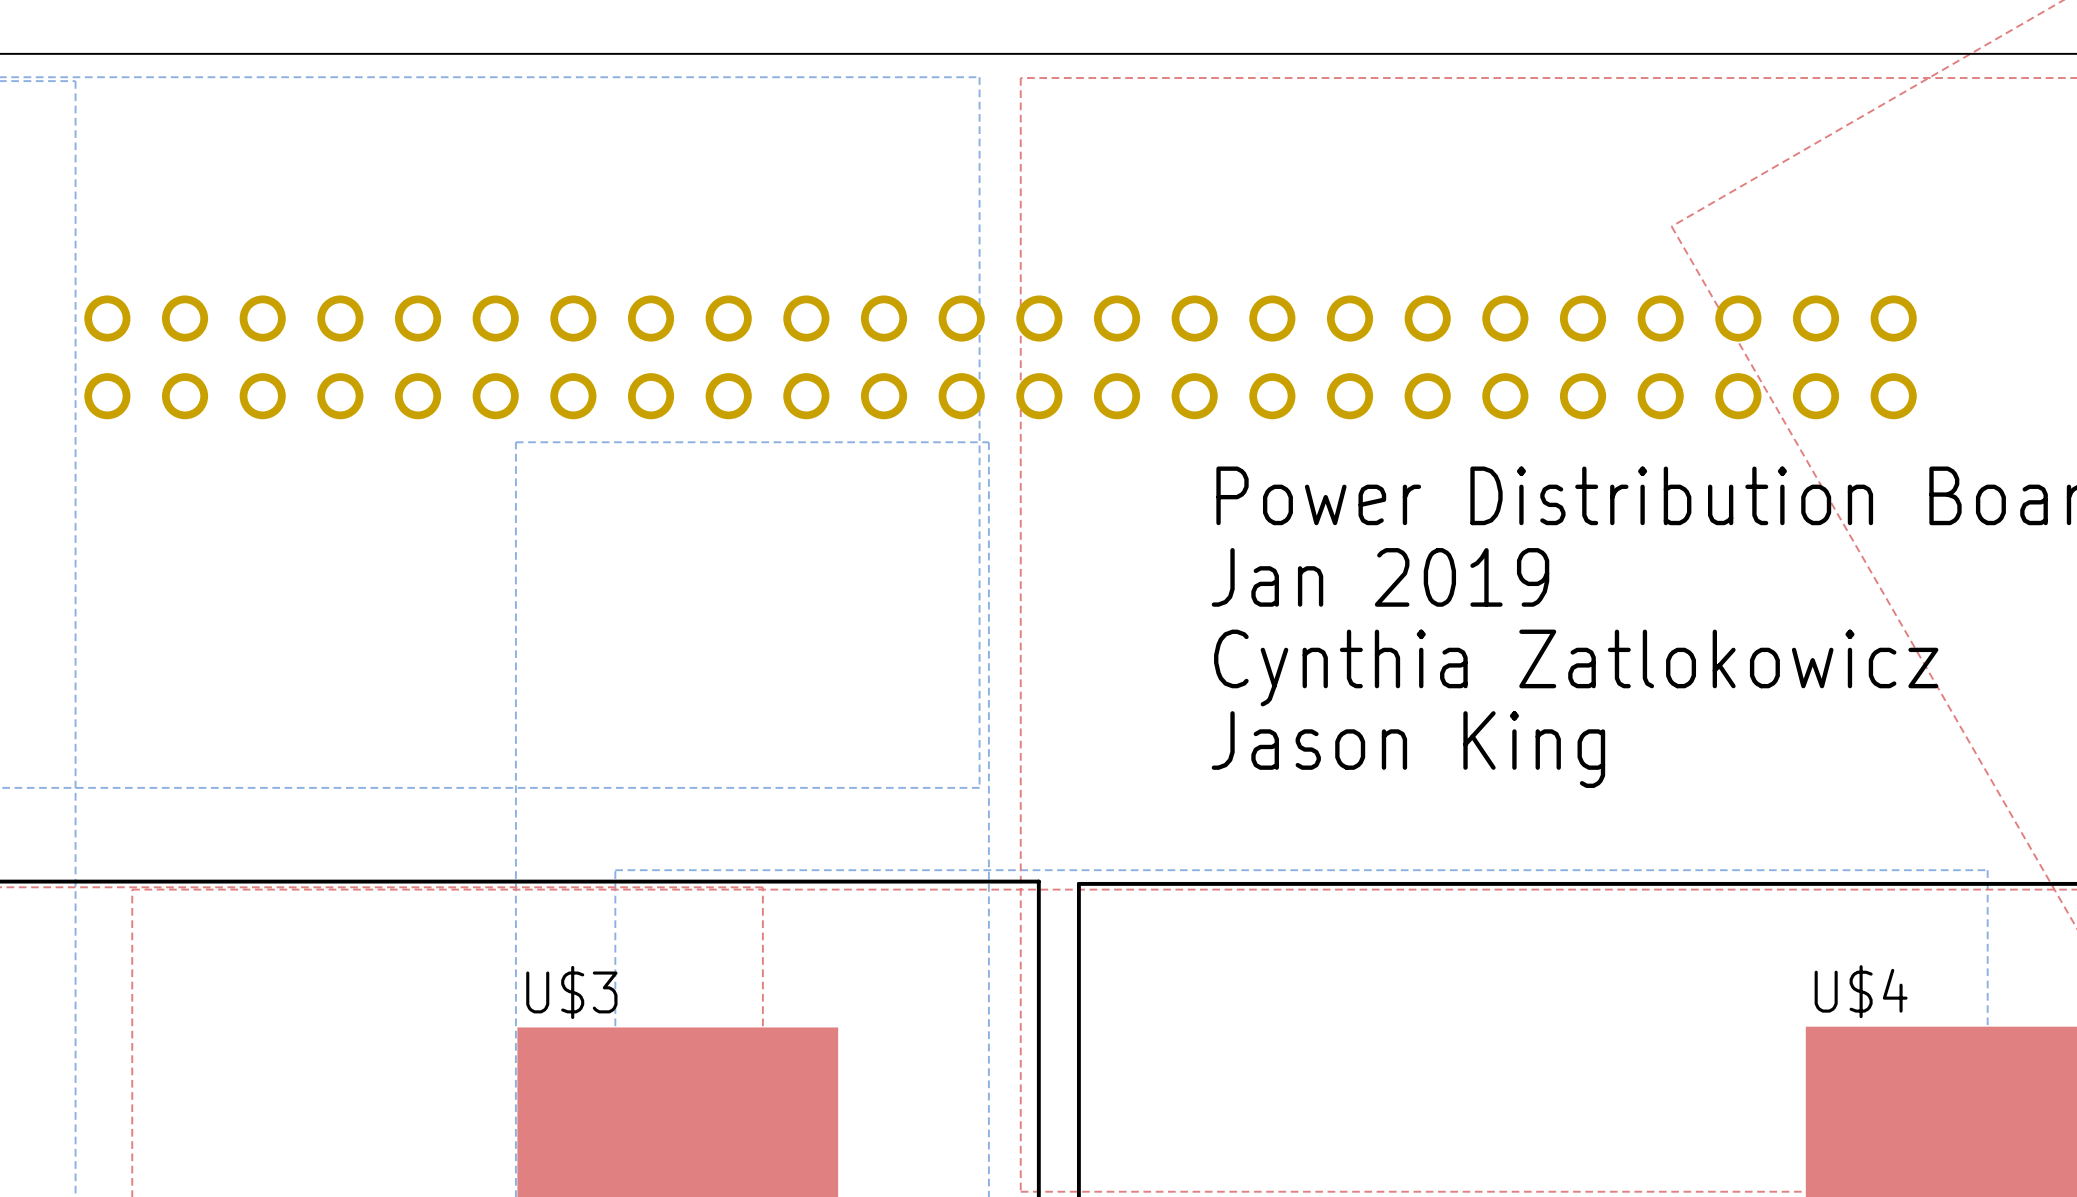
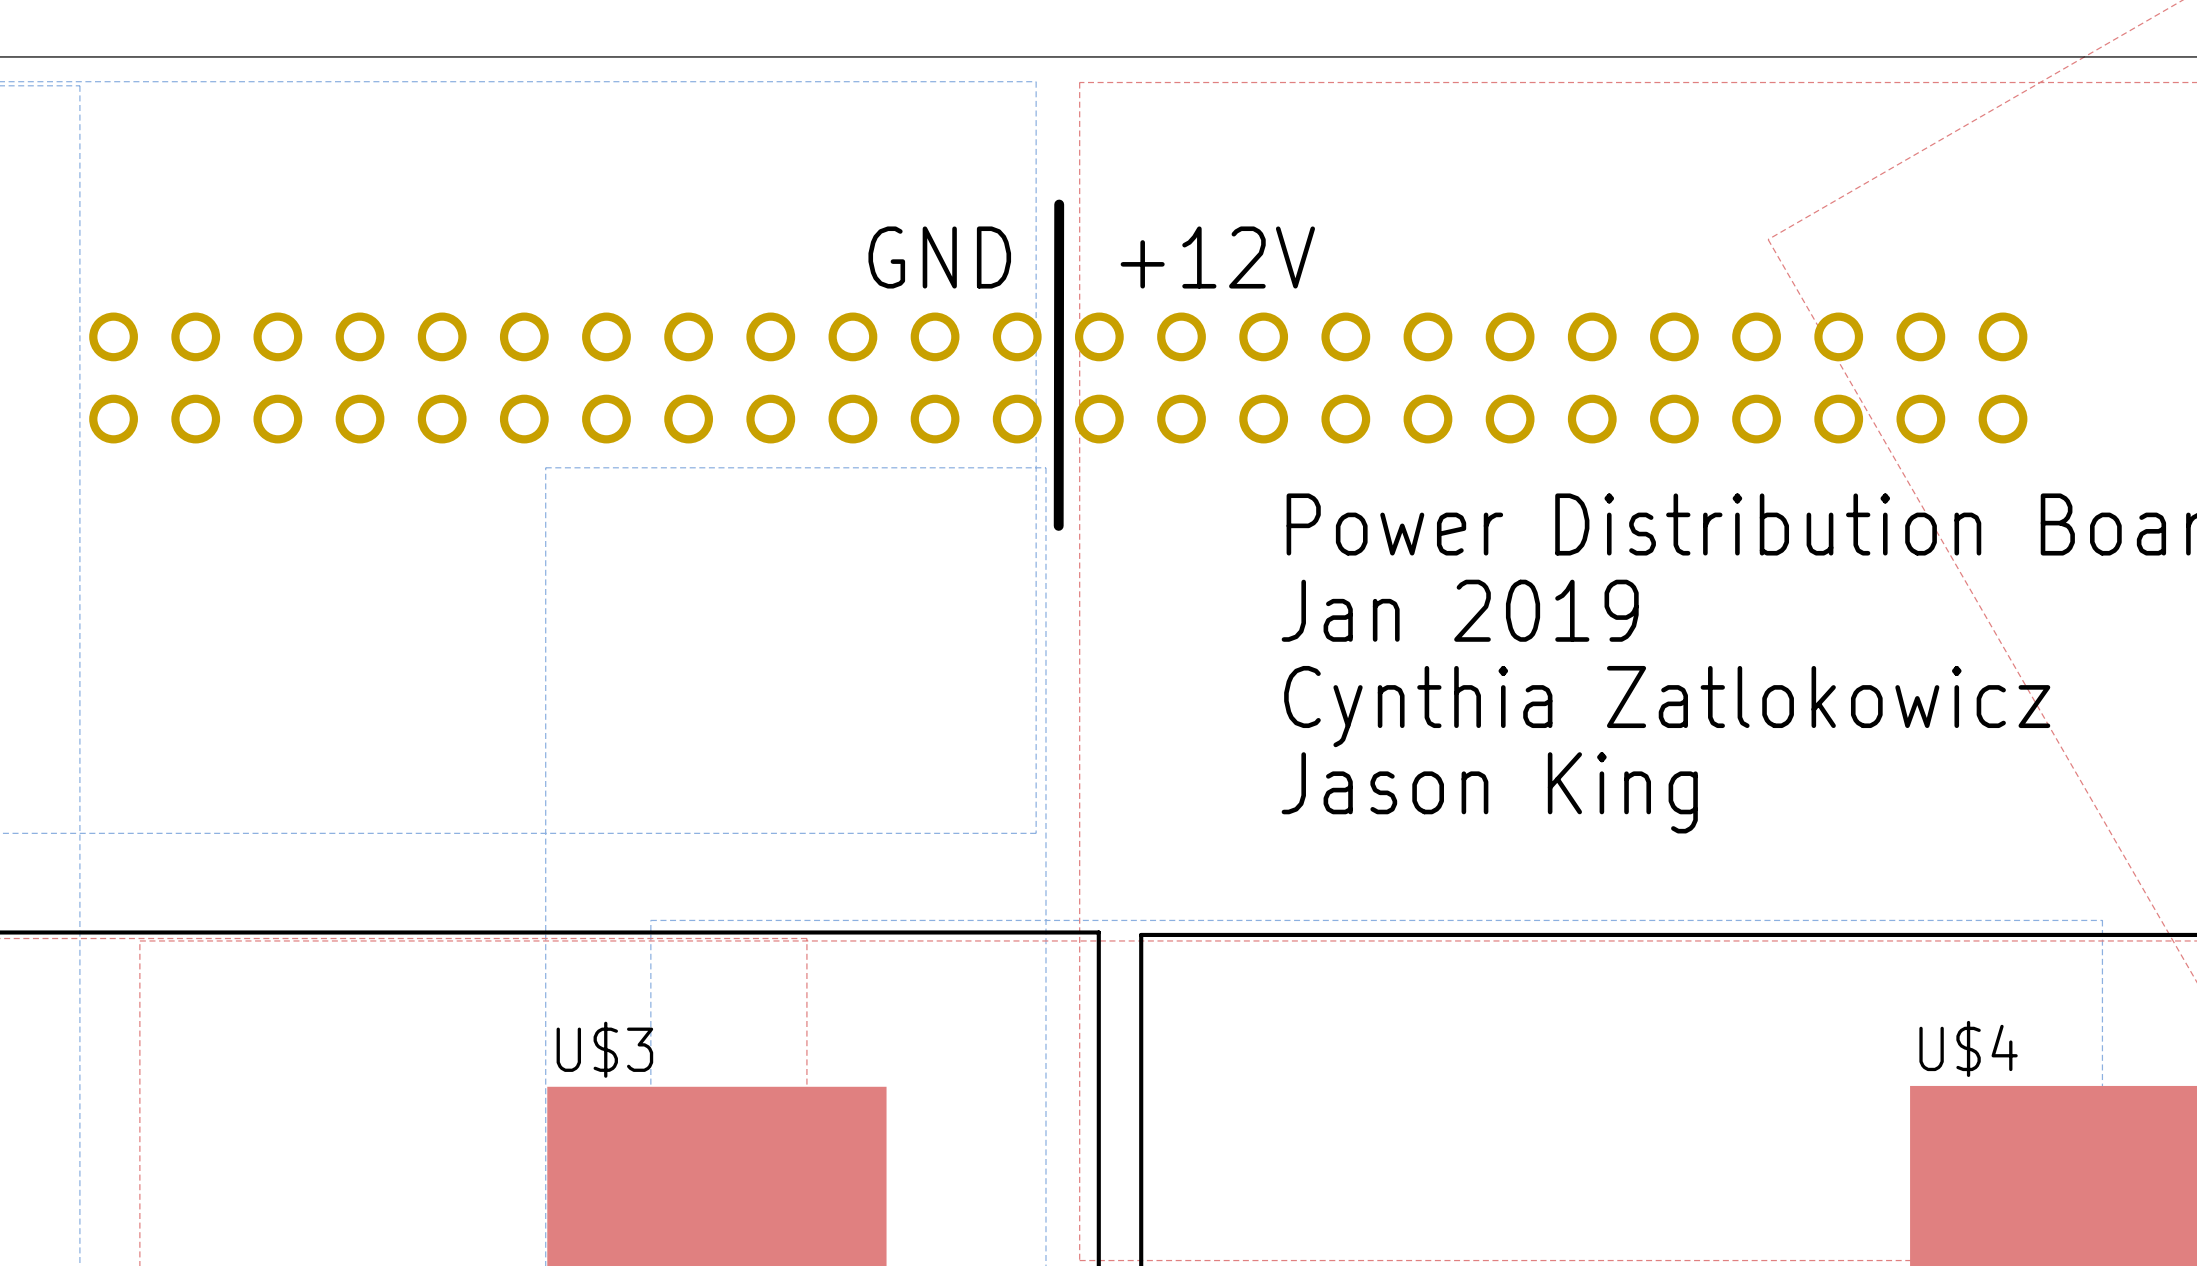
line: none -> (1059, 204) (1058, 525)
text: none -> GND (939, 257)
text: none -> +12V (1217, 257)

